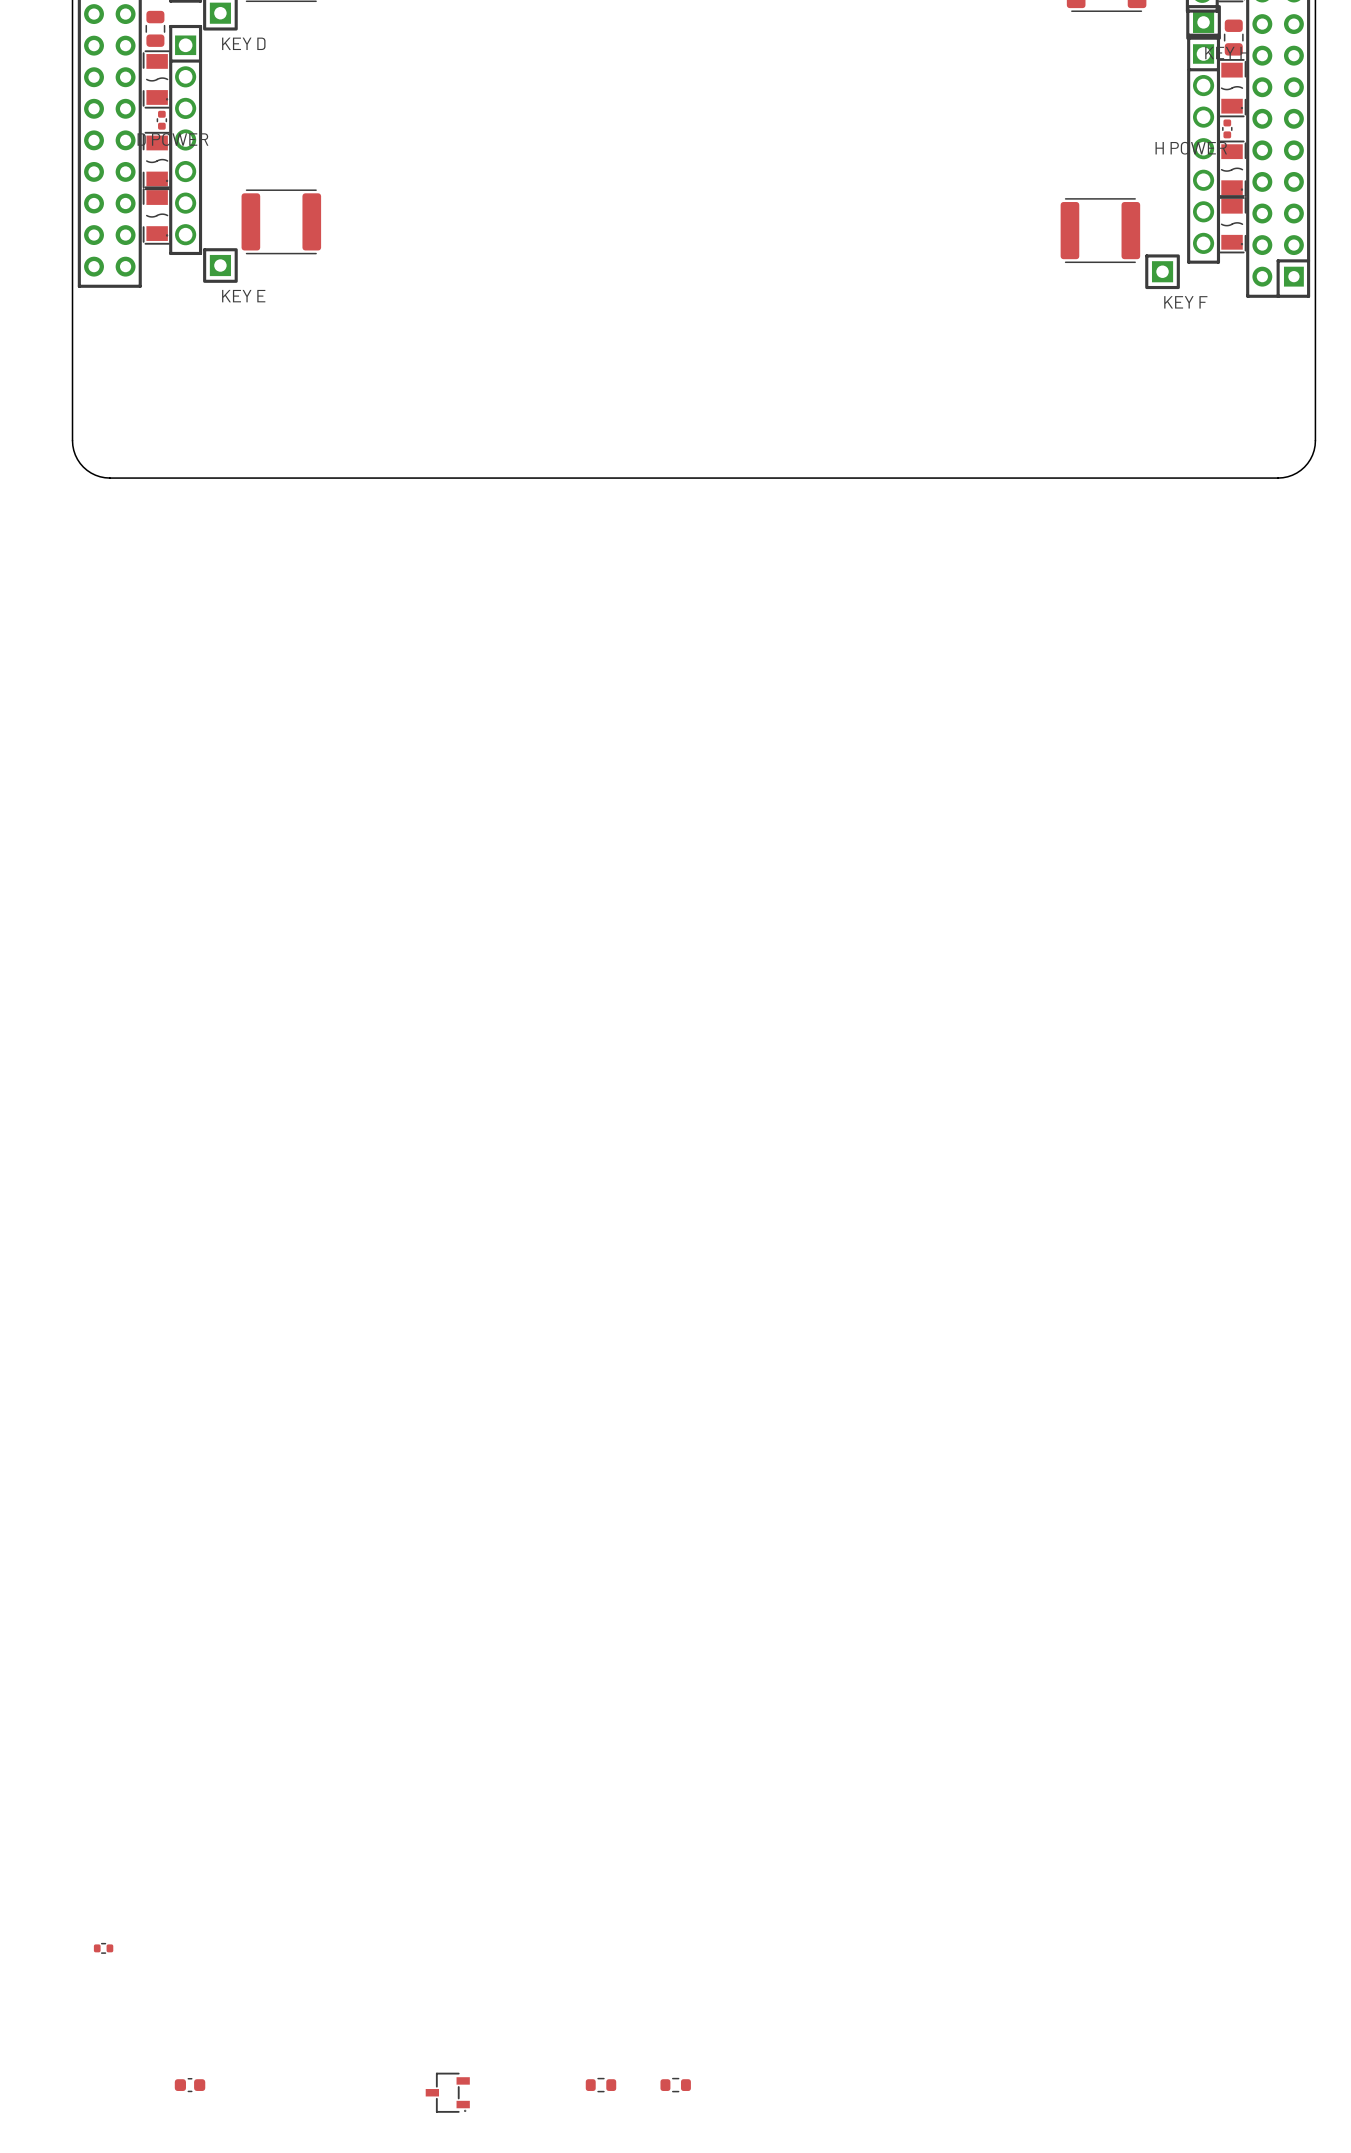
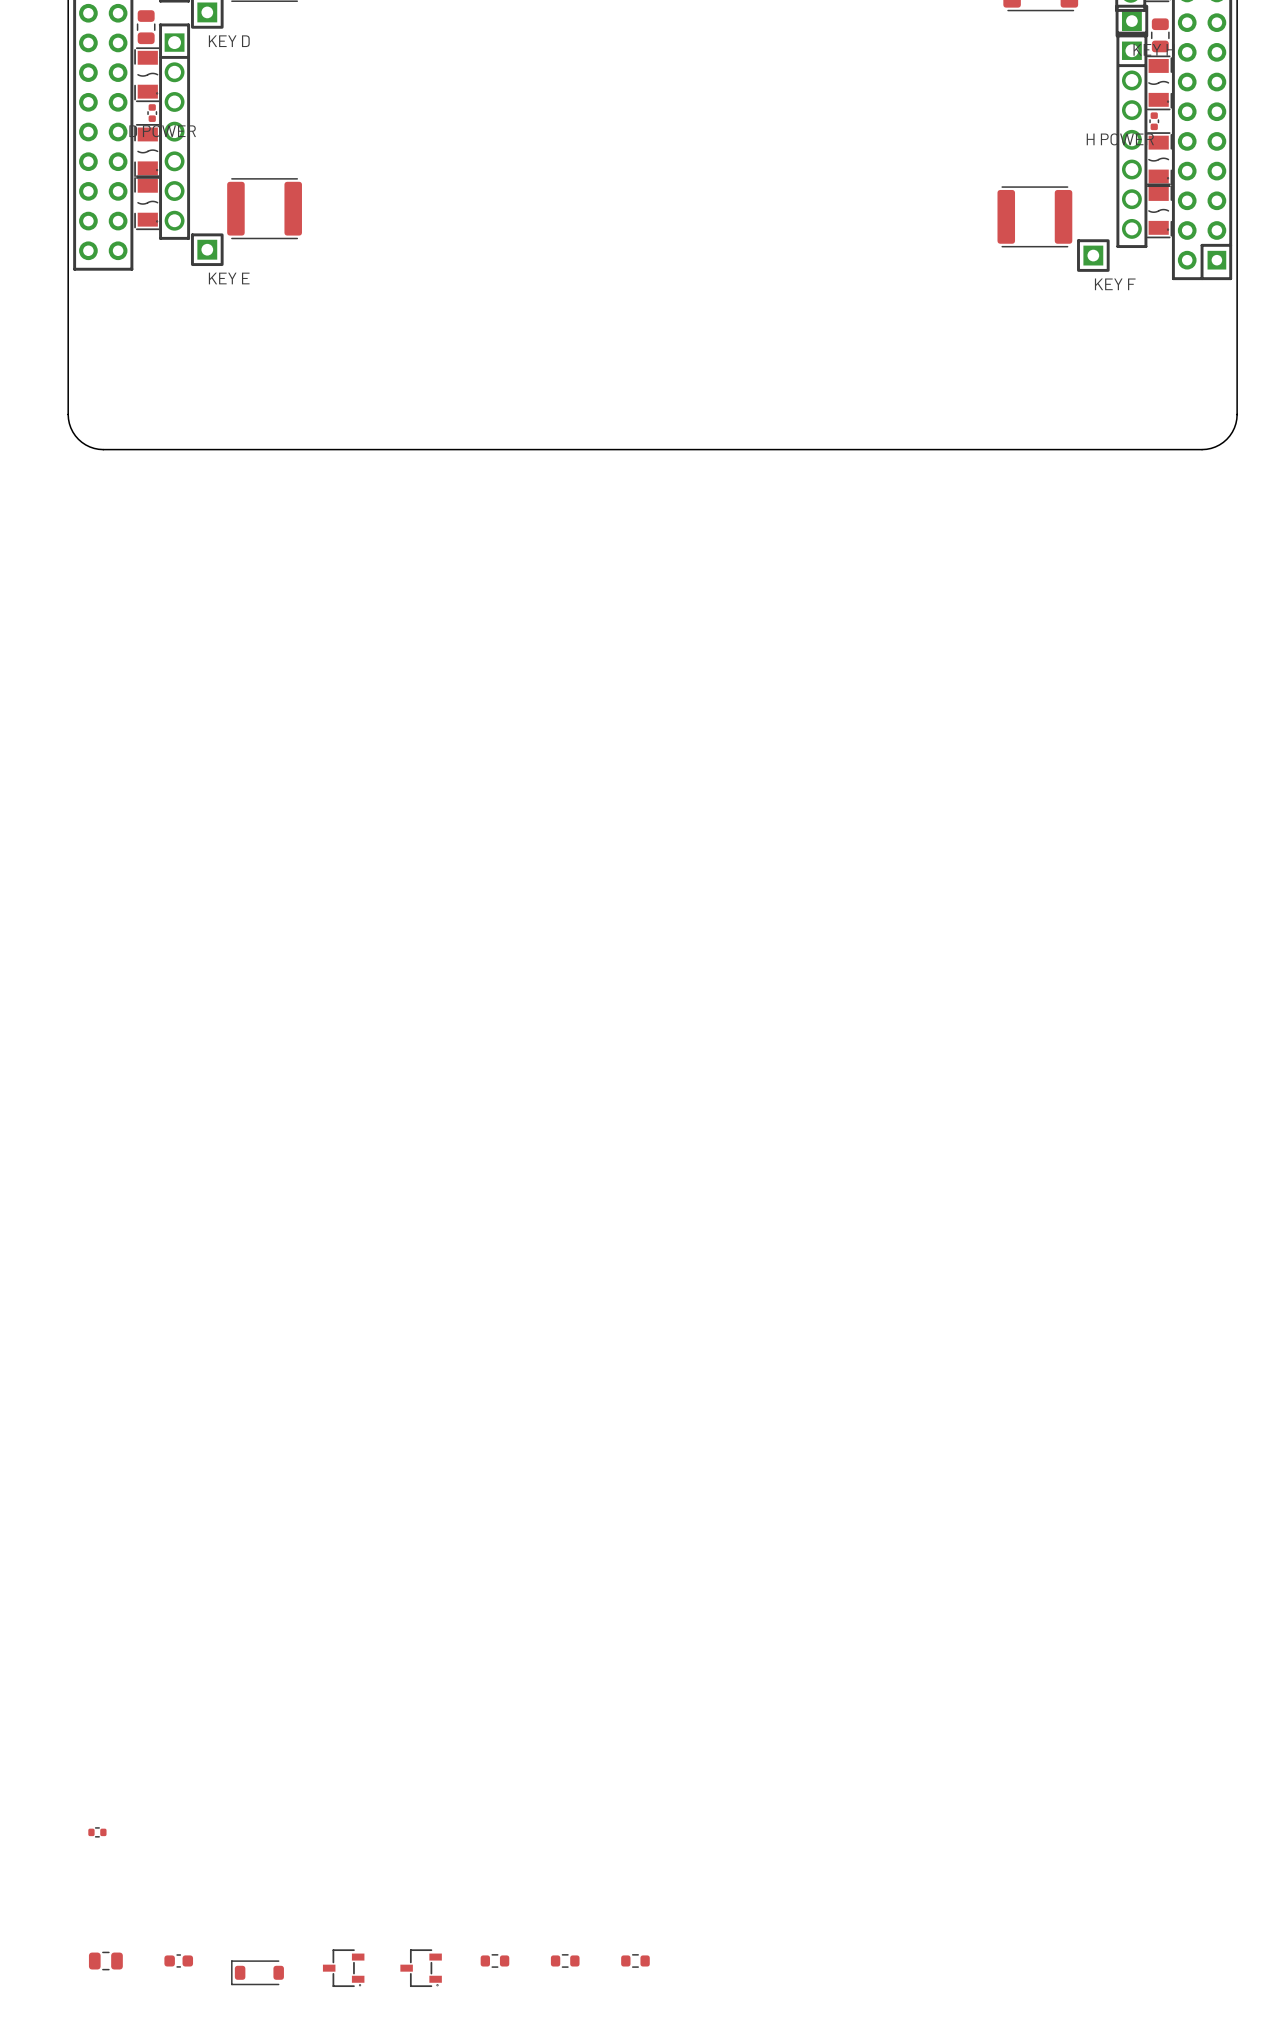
part: none -> (105, 1961)
part: none -> (494, 1960)
part: none -> (343, 1968)
part: none -> (257, 1972)

